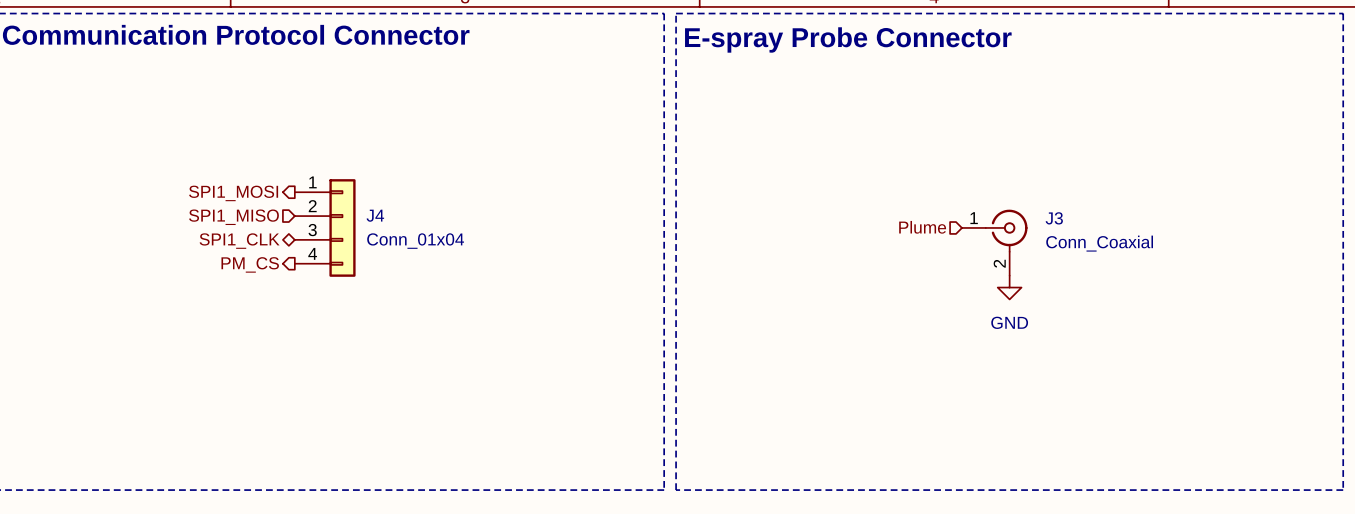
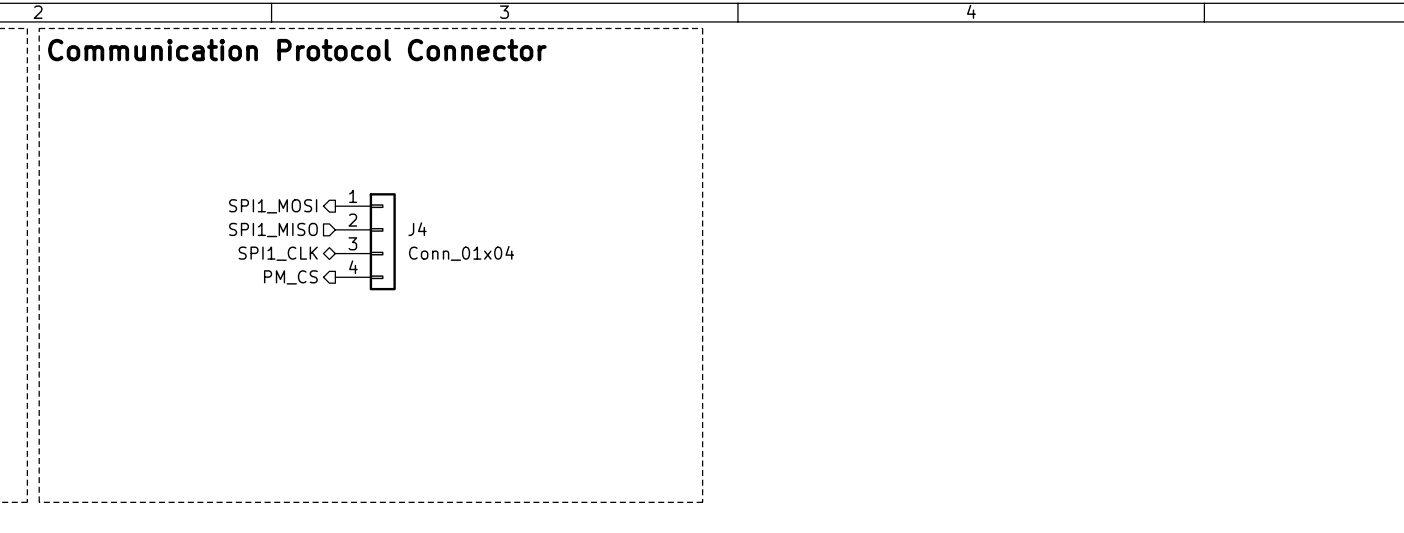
line: (676, 13) (1343, 13) (1343, 490) (676, 490) (676, 13) -> none
text: E-spray Probe Connector (848, 39) -> none
hierarchical label: Plume (922, 227) -> none
J3: Conn_Coaxial (994, 242) -> none
power symbol: GND (1009, 287) -> none

